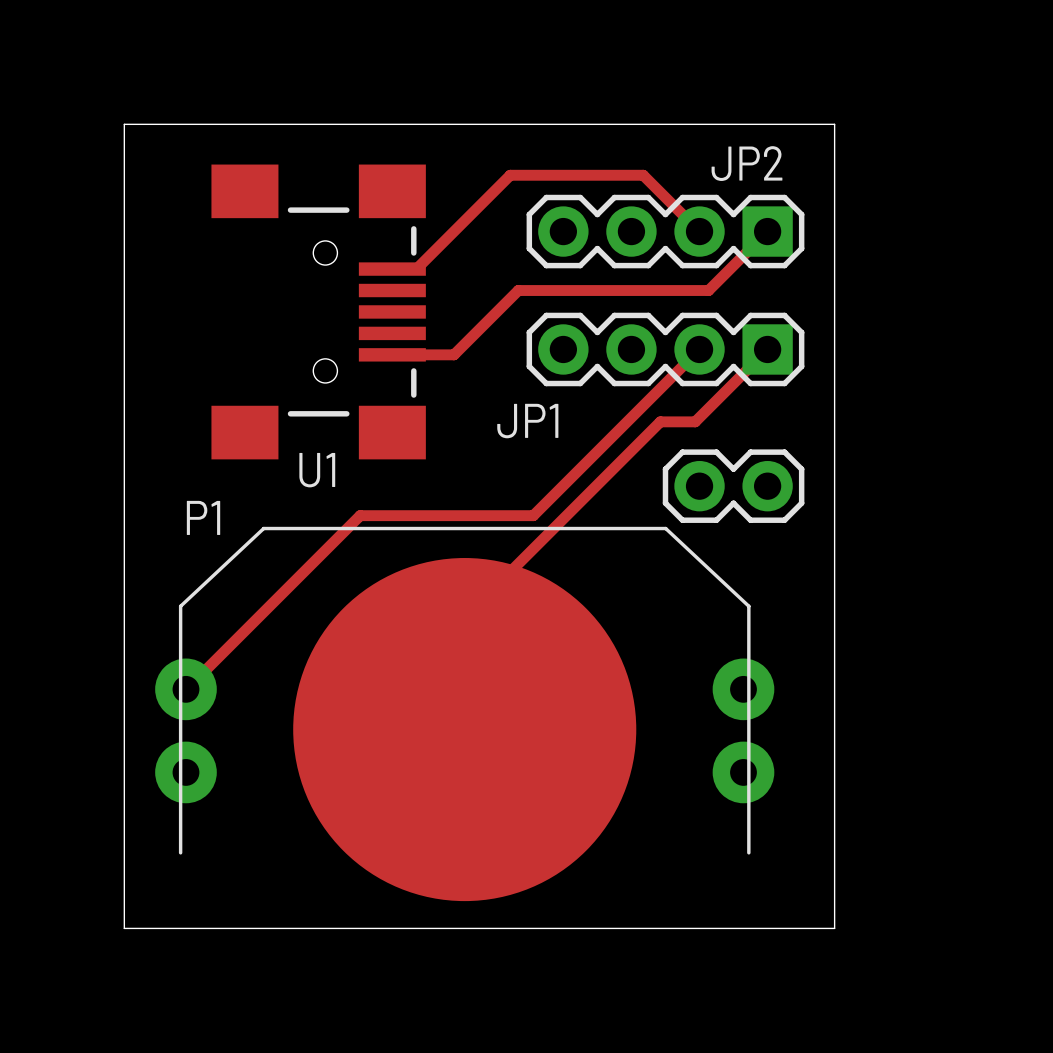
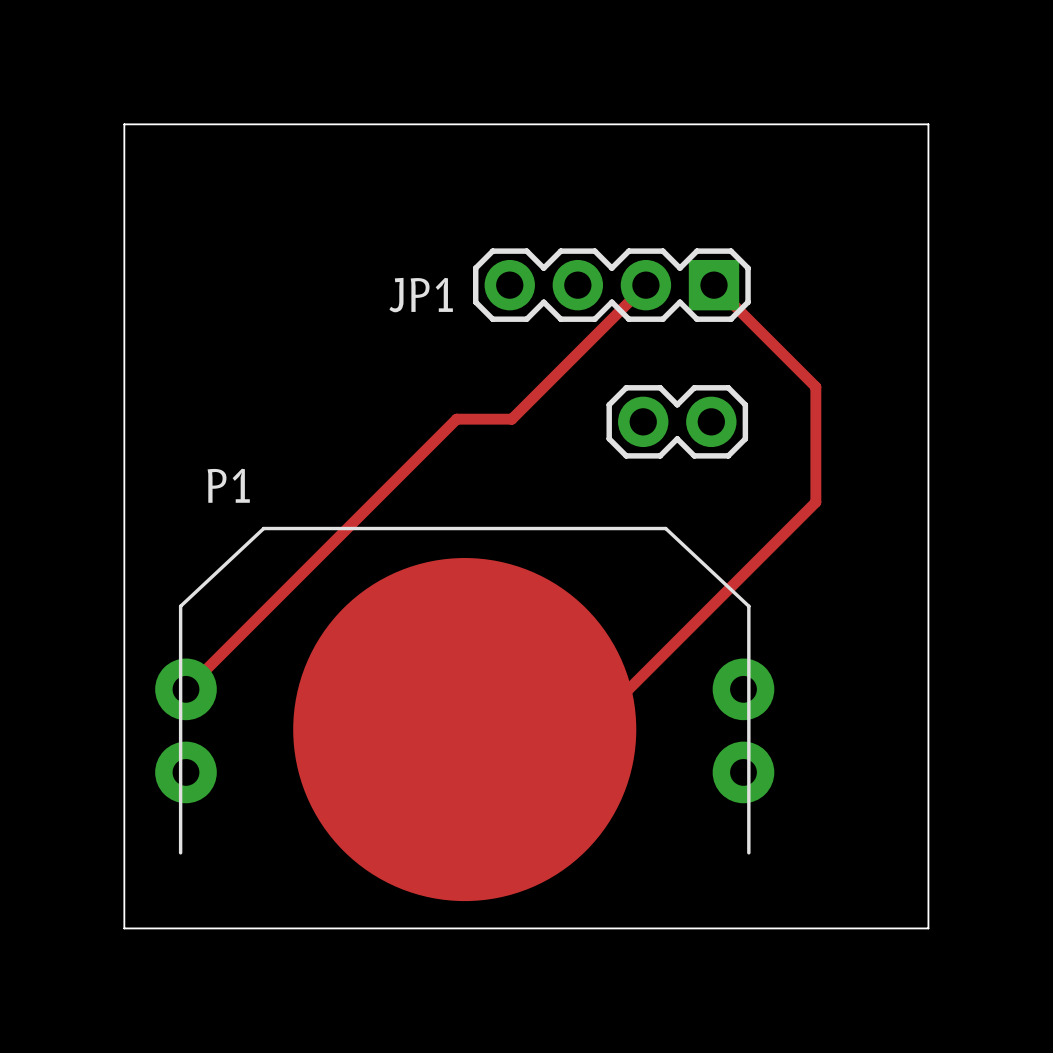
board edge: (834, 124) (834, 928) -> (834, 124) (928, 124) (928, 928) (834, 928)
JP2: (665, 231) -> none
track: (699, 231) (643, 175) (510, 175) (416, 269) (392, 269) -> none
track: (767, 231) (708, 290) (518, 290) (454, 354) (392, 354) -> none
U1: (318, 311) -> none
JP1 position: (665, 349) -> (611, 285)
track: (699, 349) (533, 515) (360, 515) -> (645, 285) (511, 419) (456, 419) (360, 515)
track: (767, 349) (695, 421) (660, 421) (464, 617) (464, 729) -> (714, 285) (815, 387) (815, 502) (588, 729) (464, 729)
JP1 name position: JP1 (527, 421) -> JP1 (421, 295)
part position: (733, 486) -> (677, 421)
P1 name position: P1 (203, 517) -> P1 (228, 485)

